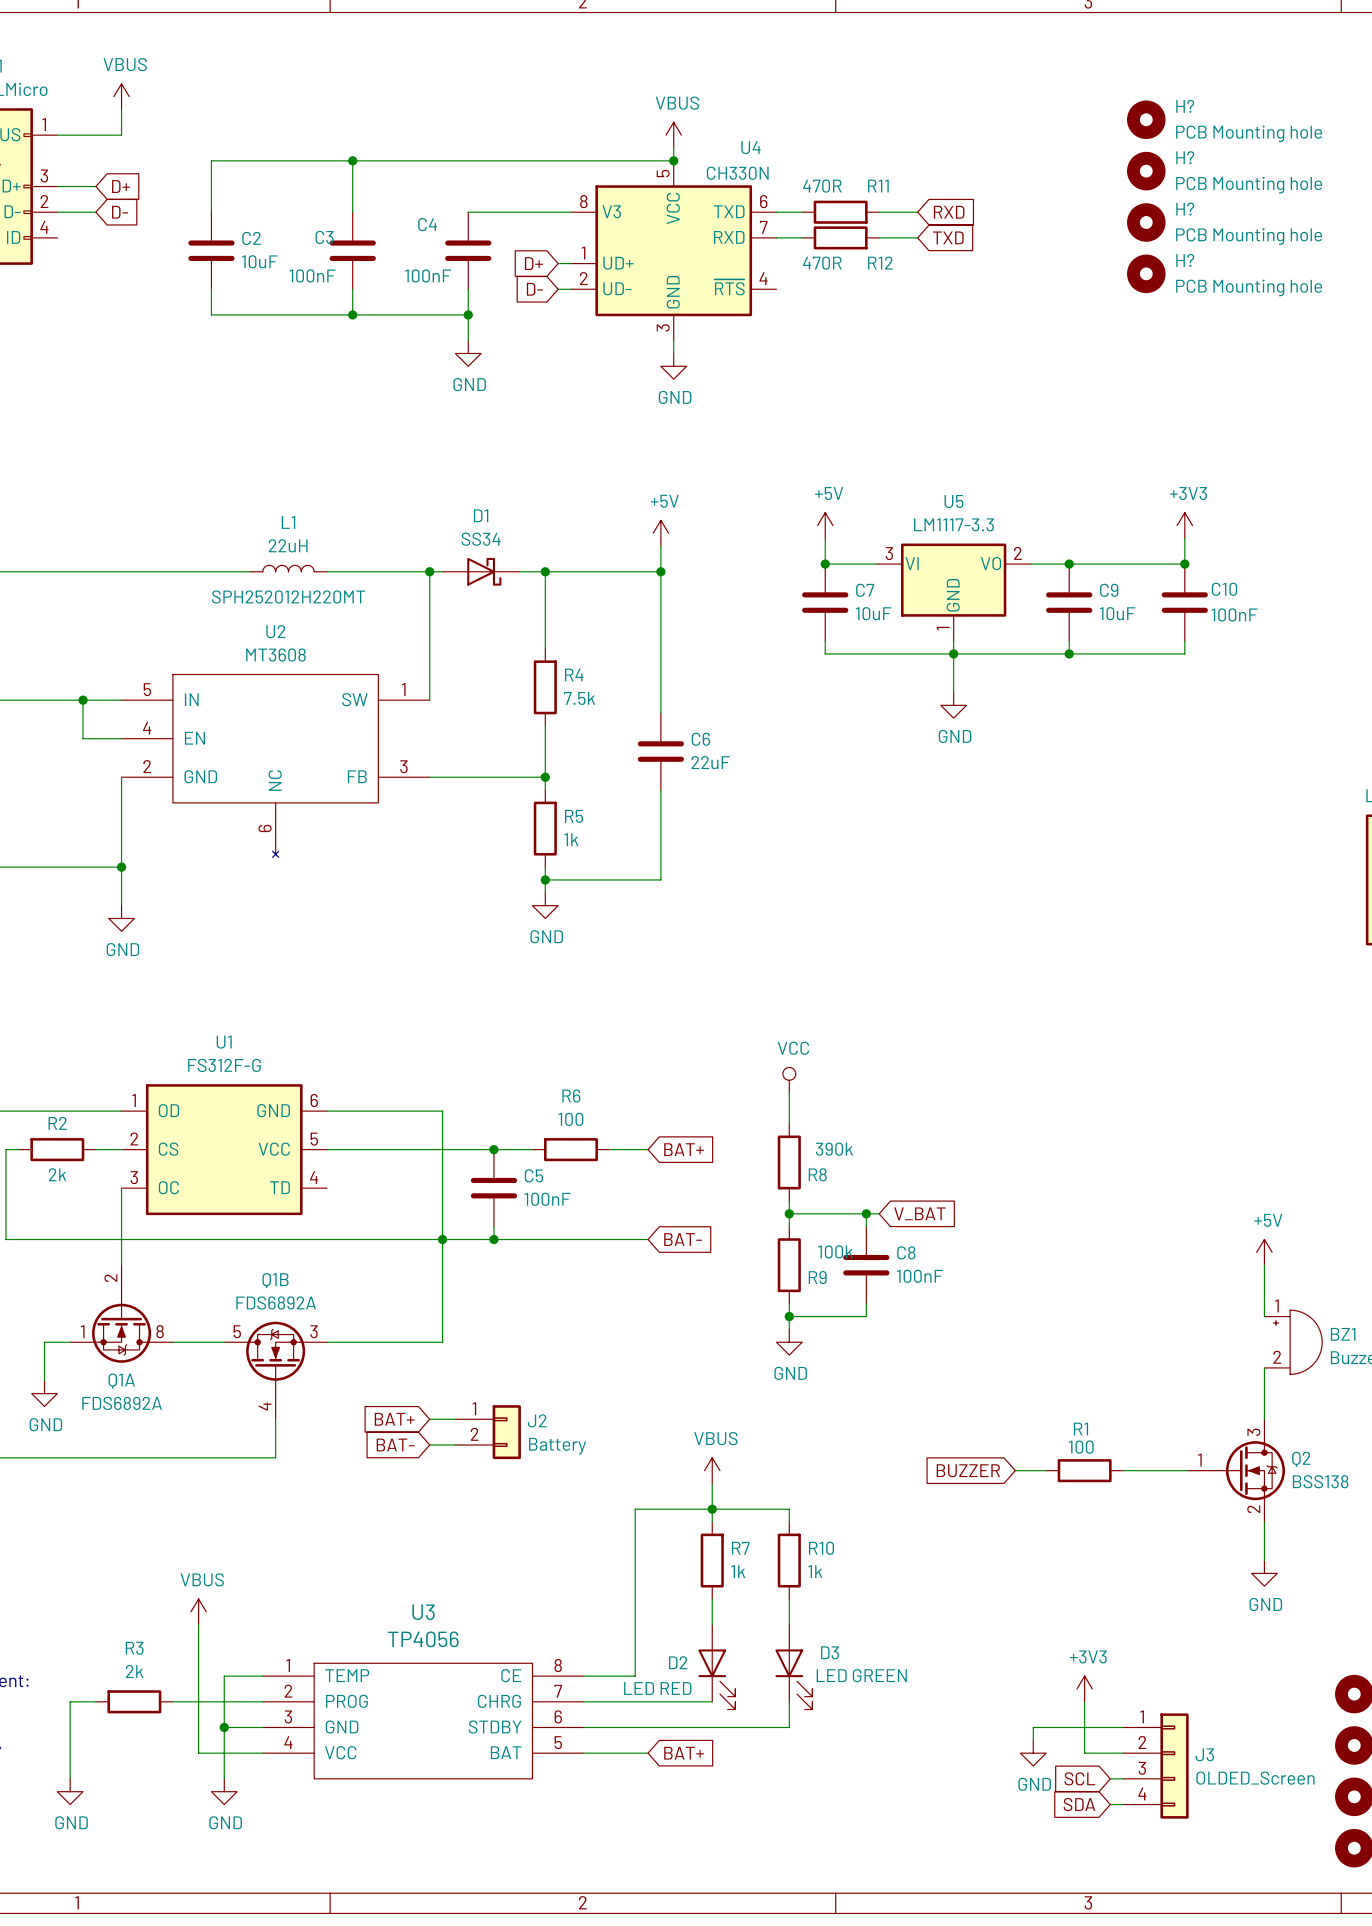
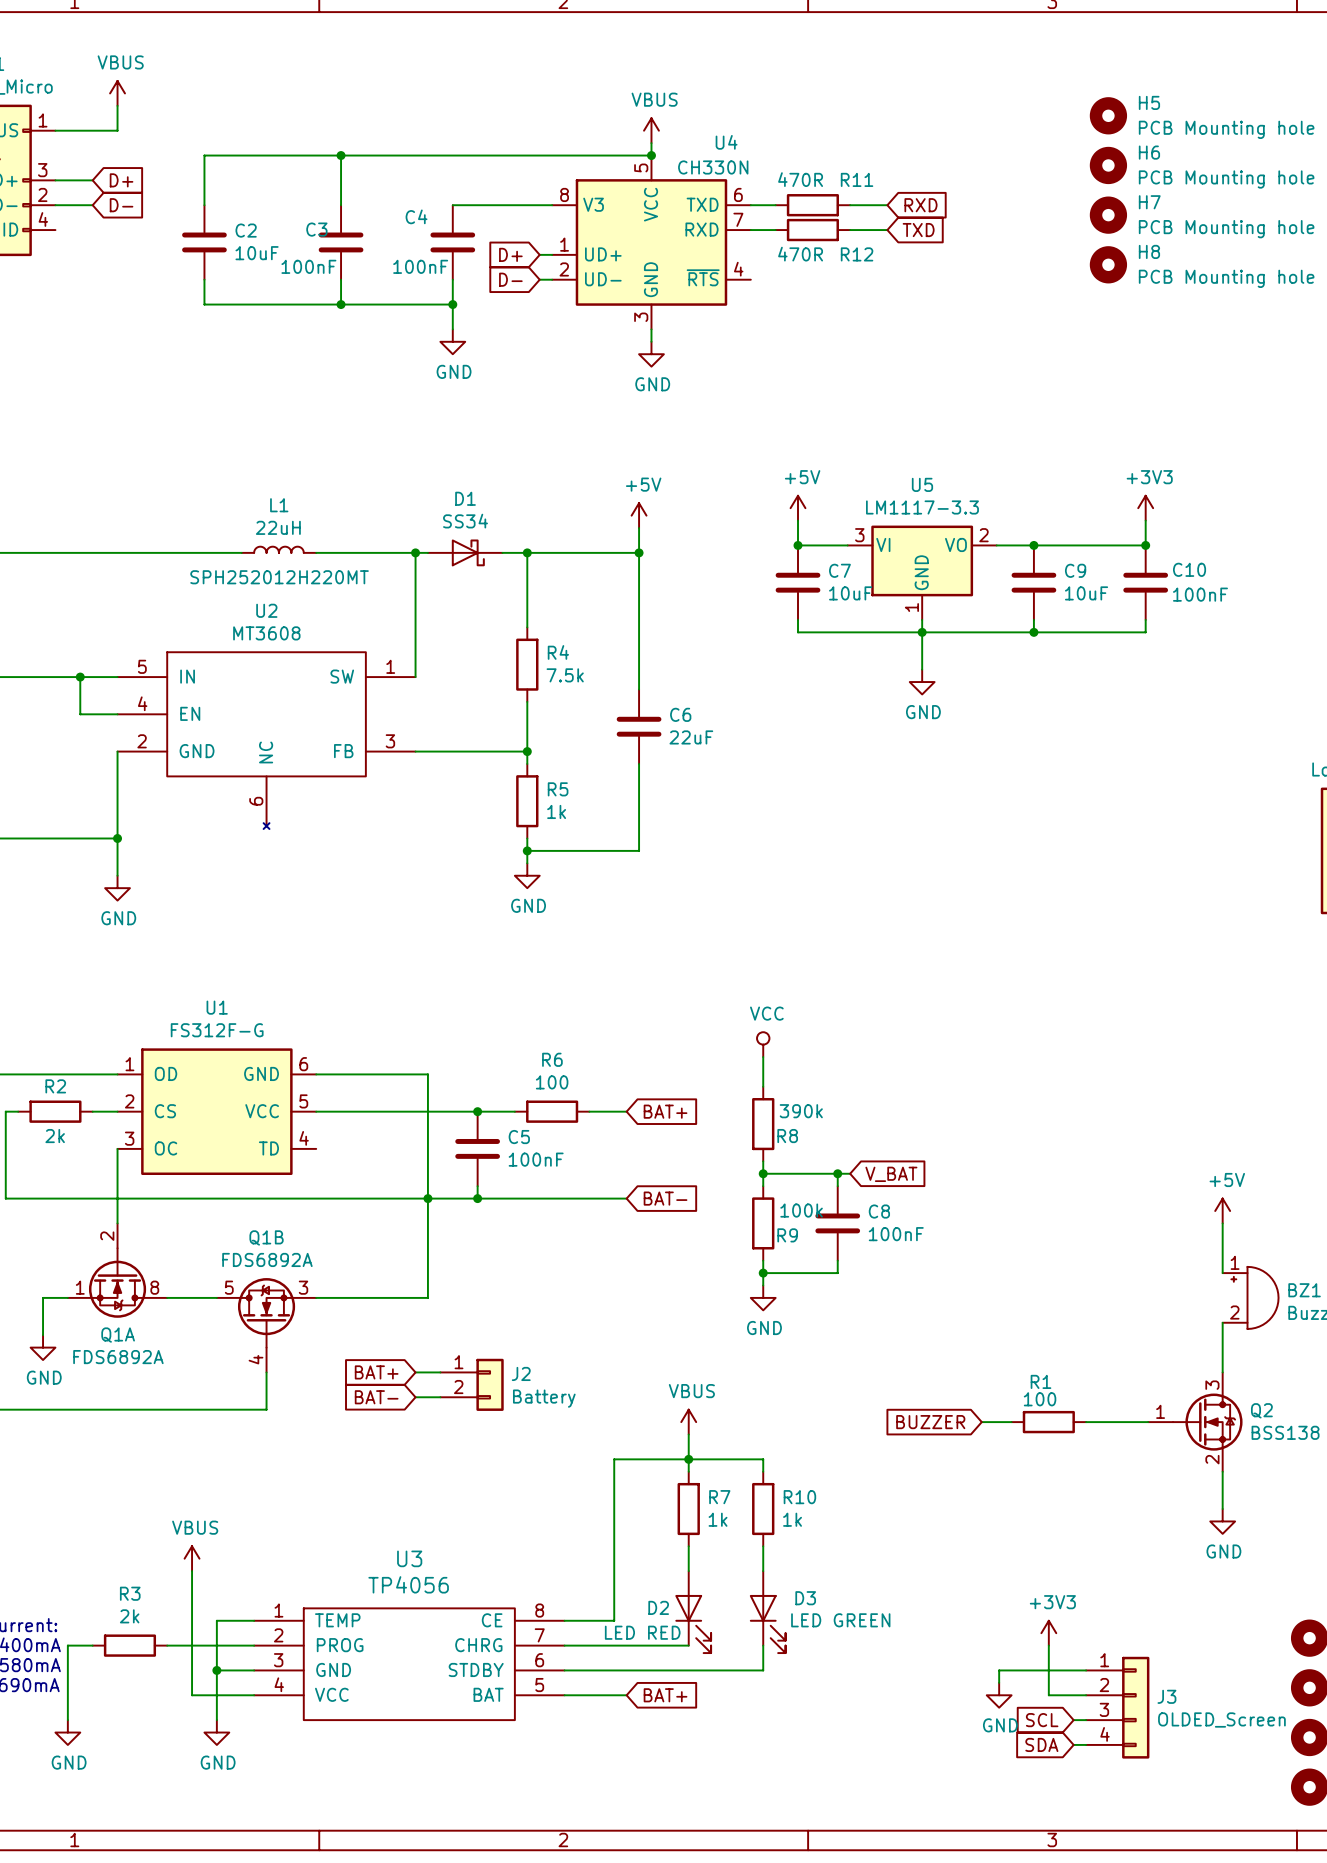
H? name: H? (1185, 106) -> H5 (1149, 102)
H? name: H? (1185, 157) -> H6 (1149, 152)
H? name: H? (1185, 209) -> H7 (1149, 202)
H? name: H? (1185, 260) -> H8 (1149, 251)

